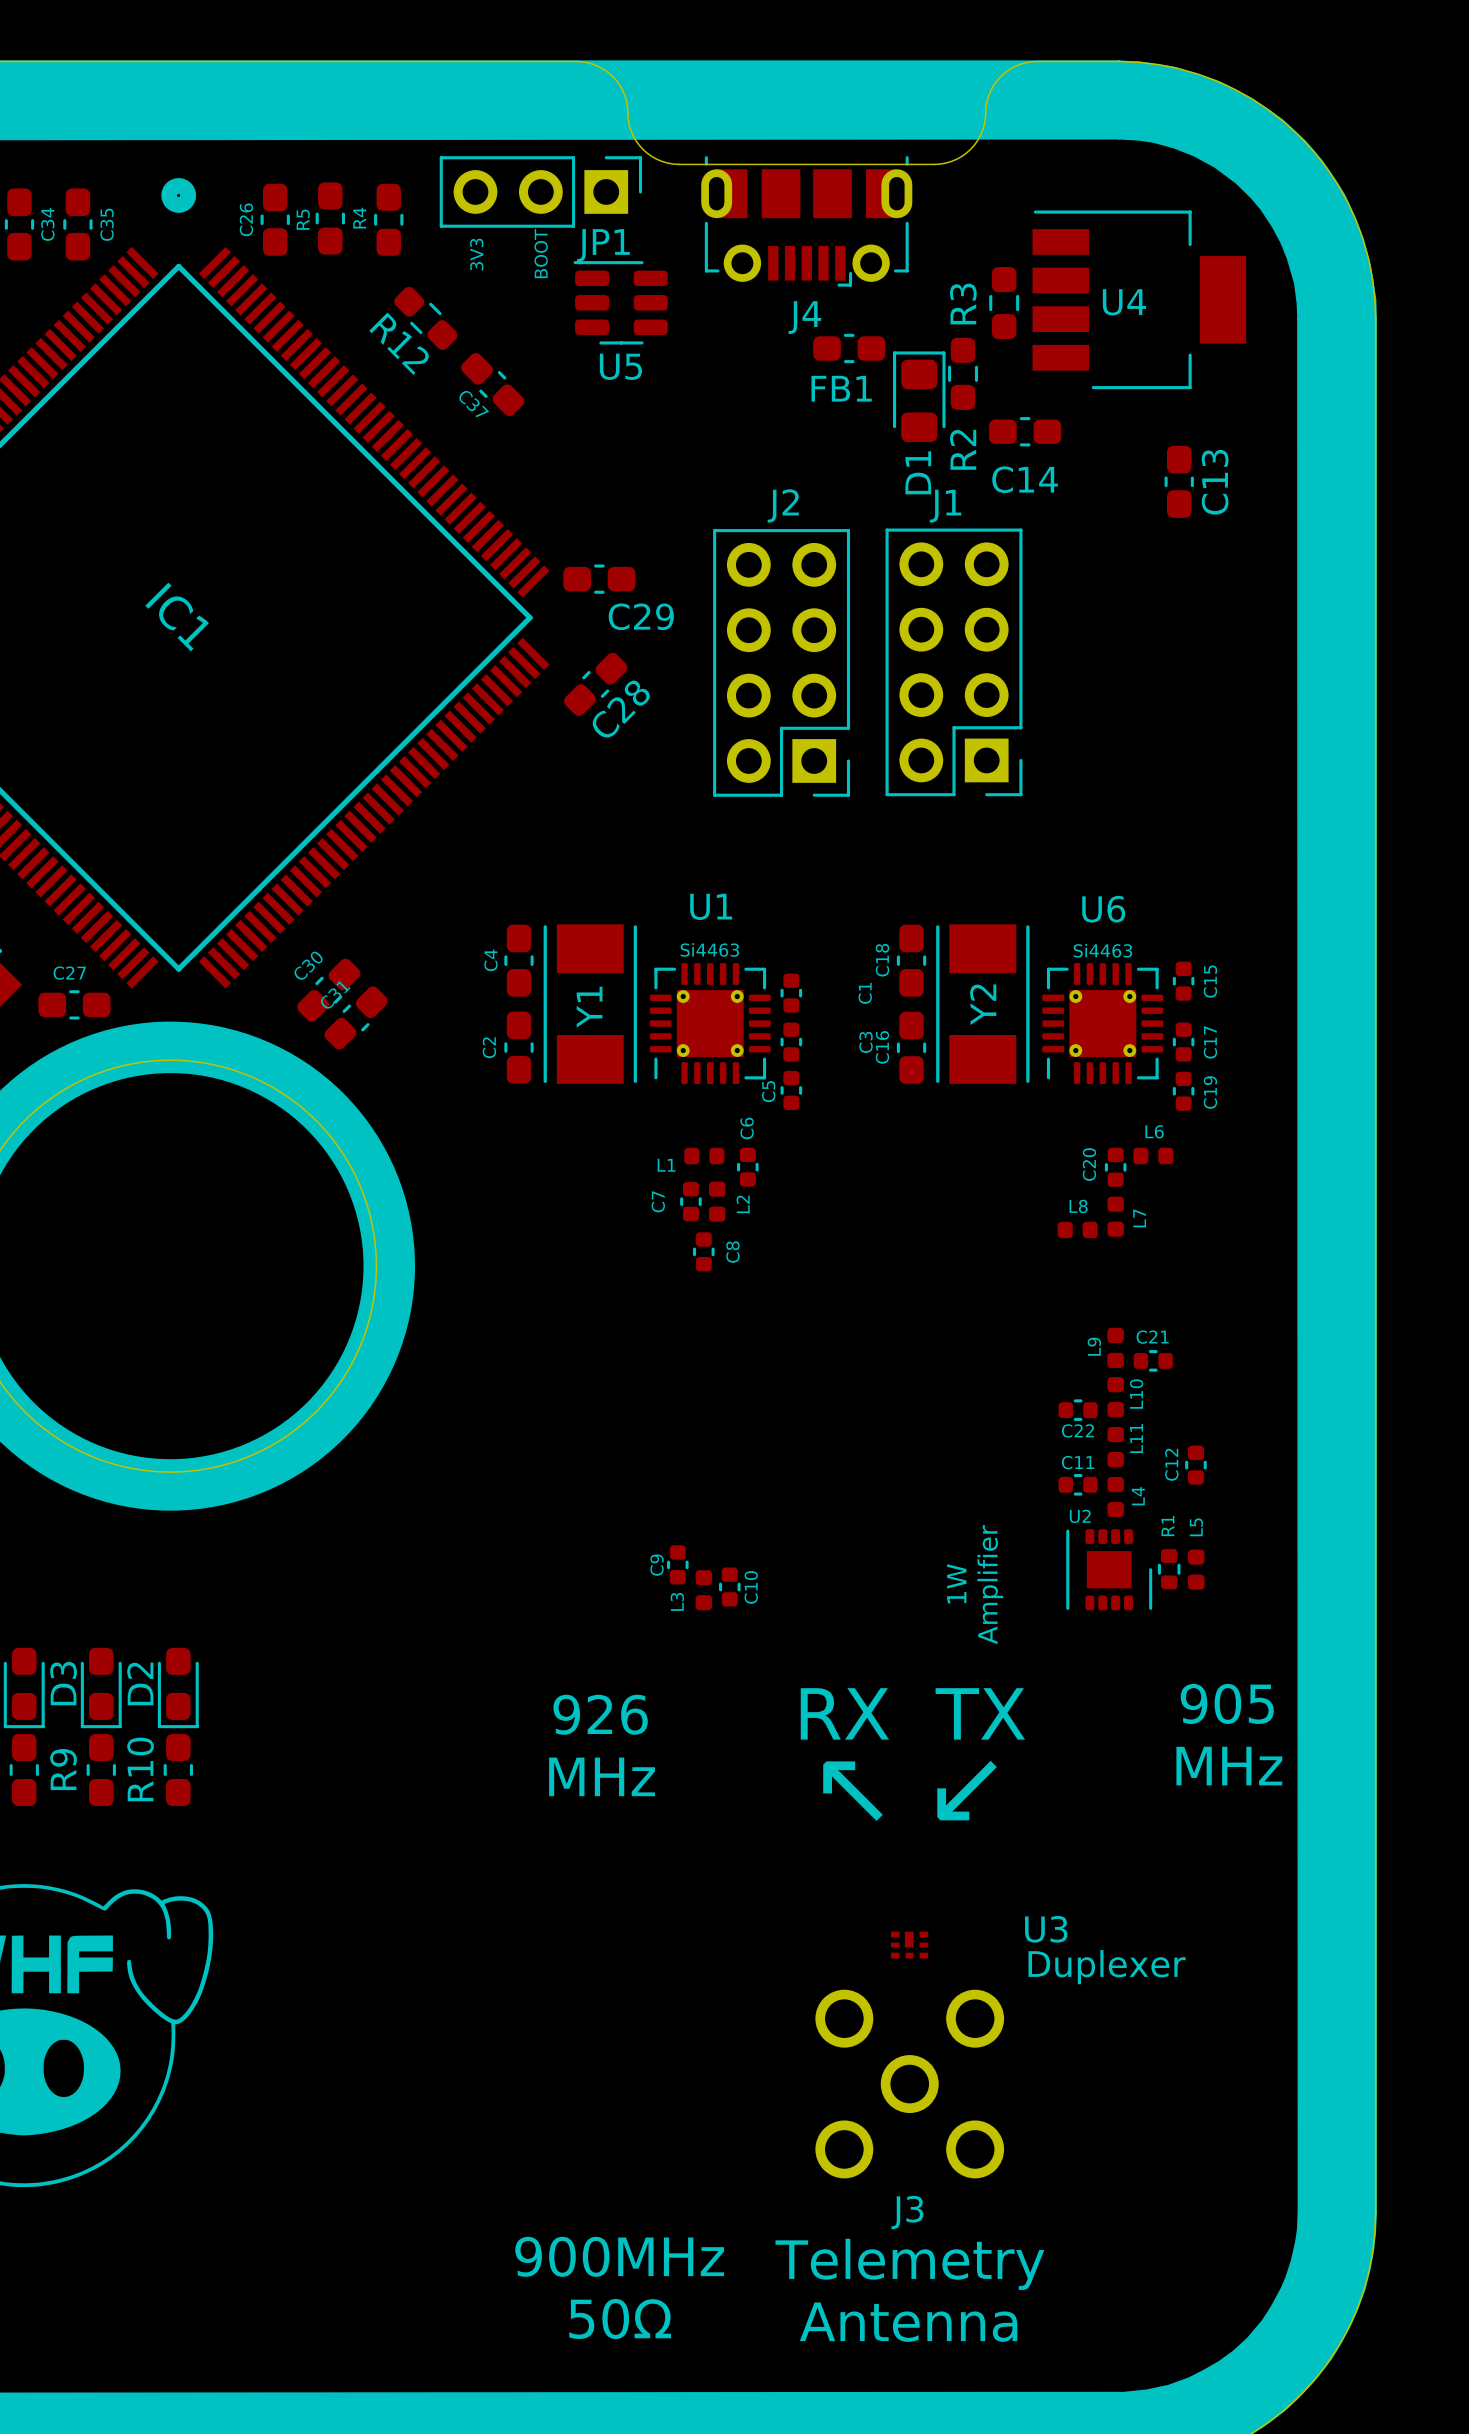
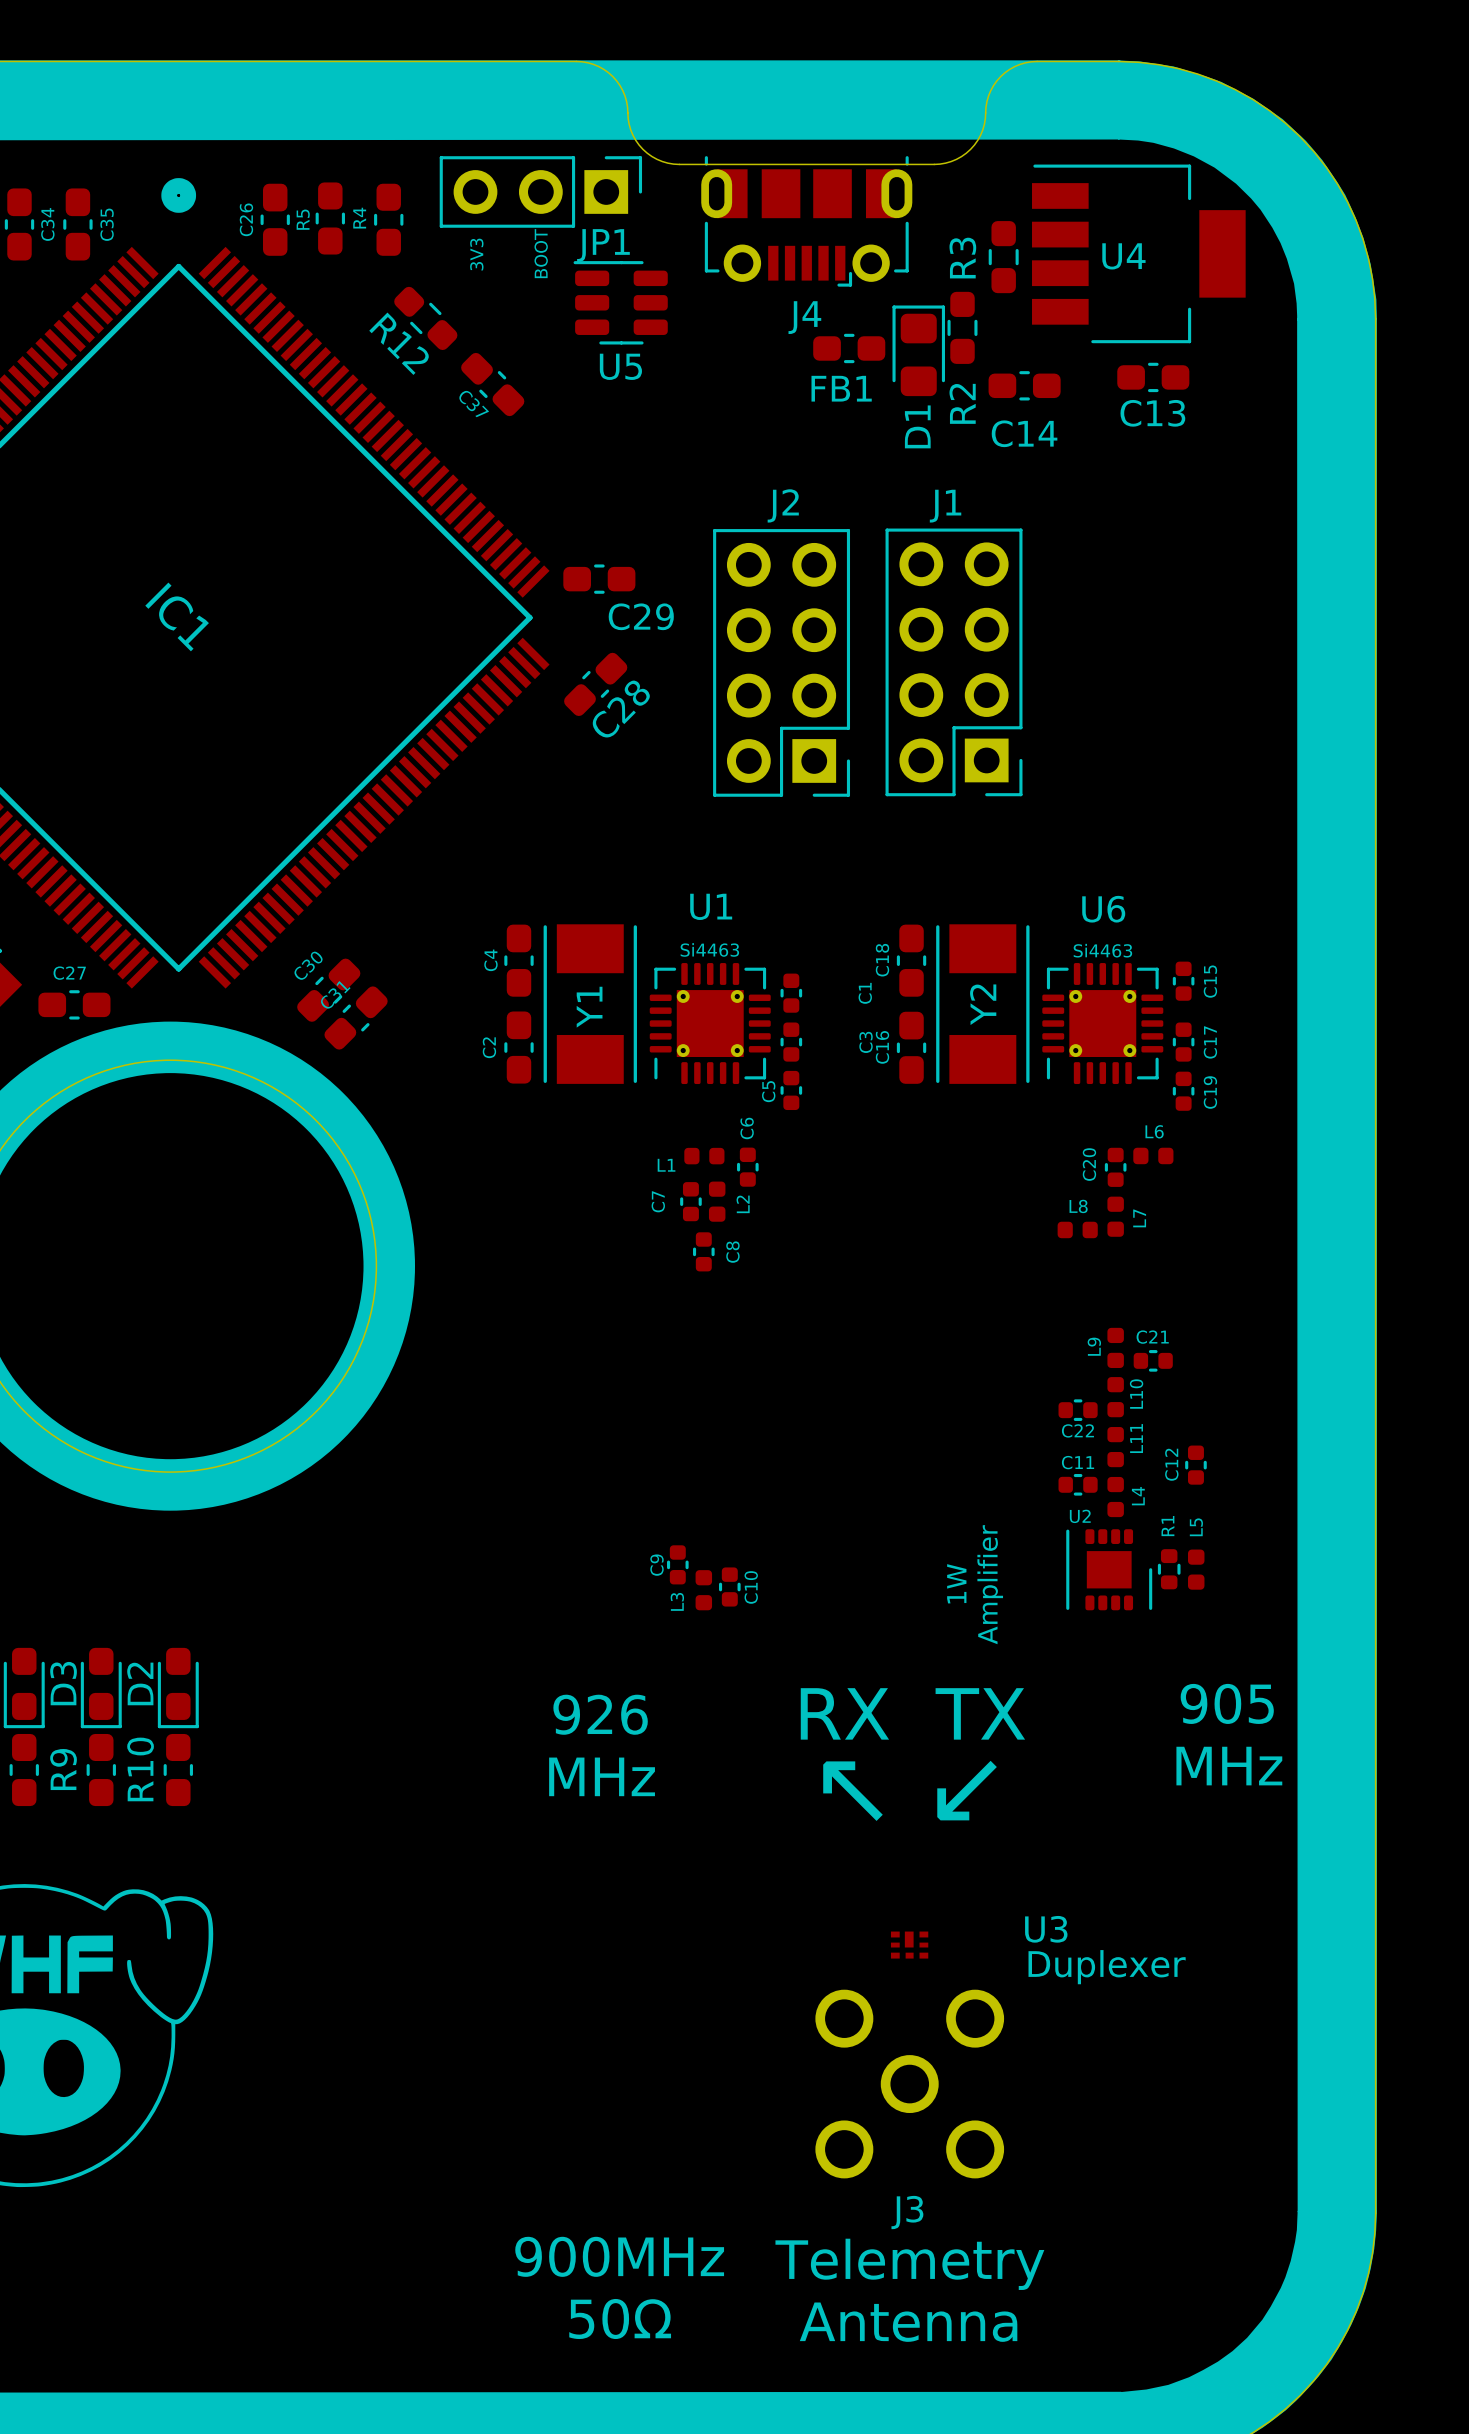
U4 position: (1139, 299) -> (1138, 253)
R3 position: (1004, 303) -> (1003, 257)
R2 position: (963, 373) -> (962, 327)
D1 position: (919, 396) -> (918, 350)
C14 position: (1025, 431) -> (1024, 385)
C13 rotation: 0° (1179, 481) -> 90° clockwise (1153, 377)
C13 position: (1179, 481) -> (1153, 377)

